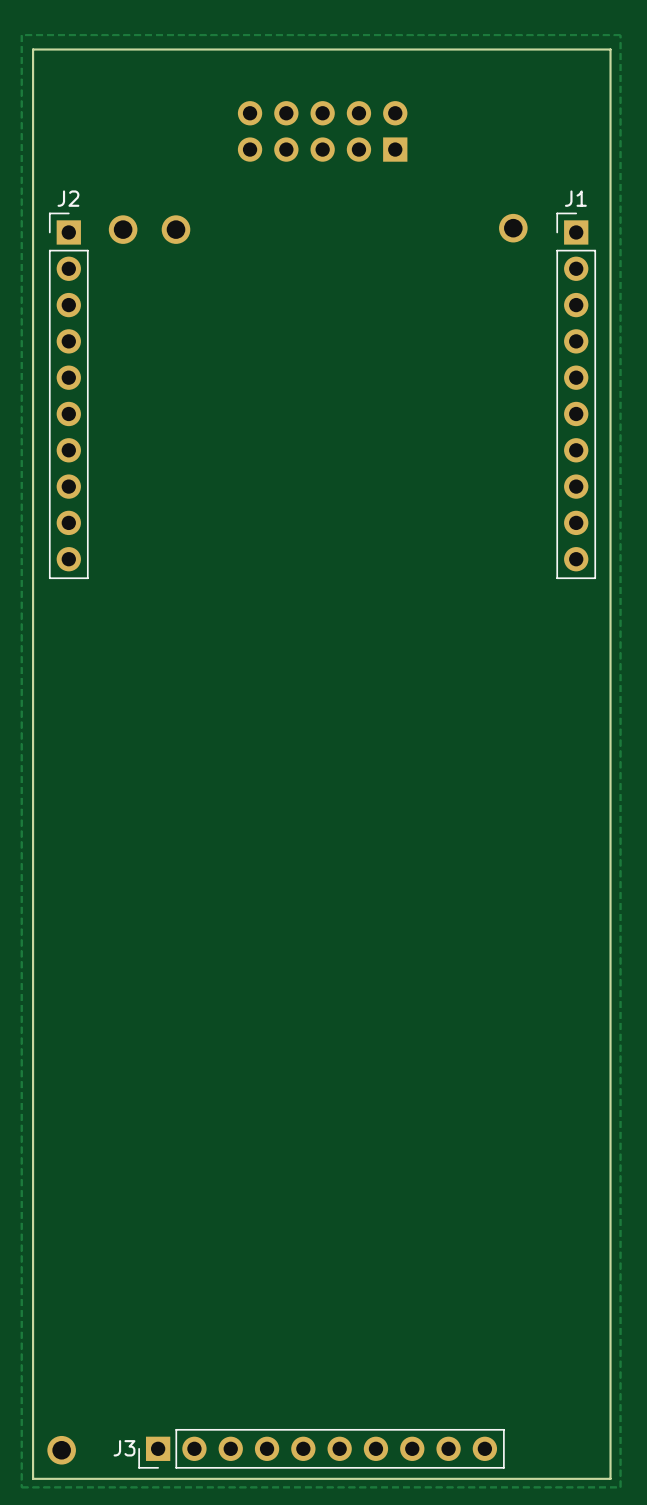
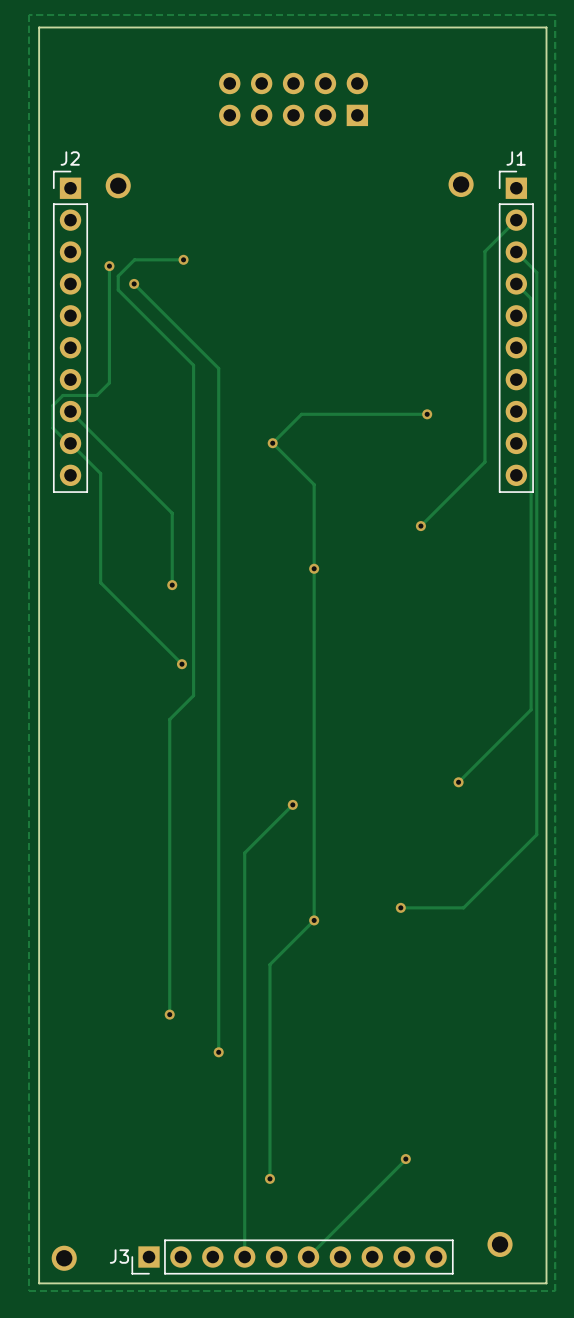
part: (176, 229) -> none
track: none -> (516, 220) (484, 251) (484, 462) (420, 526)
track: none -> (516, 252) (536, 272) (536, 834) (463, 907) (400, 907)
track: none -> (183, 259) (134, 259) (118, 276) (118, 289) (193, 365) (193, 695) (169, 719) (169, 1014)
via: none -> (183, 259)
track: none -> (109, 266) (109, 382) (96, 395) (62, 395) (52, 405) (52, 428) (100, 473) (100, 582) (181, 664)
via: none -> (109, 266)
track: none -> (134, 283) (218, 368) (218, 1052)
via: none -> (134, 283)
track: none -> (516, 283) (531, 298) (531, 709) (458, 782)
track: none -> (70, 411) (172, 513) (172, 585)
track: none -> (427, 414) (301, 414) (272, 443) (314, 484) (314, 920) (269, 964) (269, 1178)
via: none -> (427, 414)
via: none -> (272, 443)
via: none -> (420, 526)
via: none -> (314, 568)
via: none -> (172, 585)
via: none -> (181, 664)
via: none -> (458, 782)
track: none -> (292, 804) (244, 852) (244, 1257)
via: none -> (292, 804)
via: none -> (400, 907)
via: none -> (314, 920)
via: none -> (169, 1014)
via: none -> (218, 1052)
track: none -> (405, 1159) (308, 1257)
via: none -> (405, 1159)
via: none -> (269, 1178)
part: none -> (500, 1244)

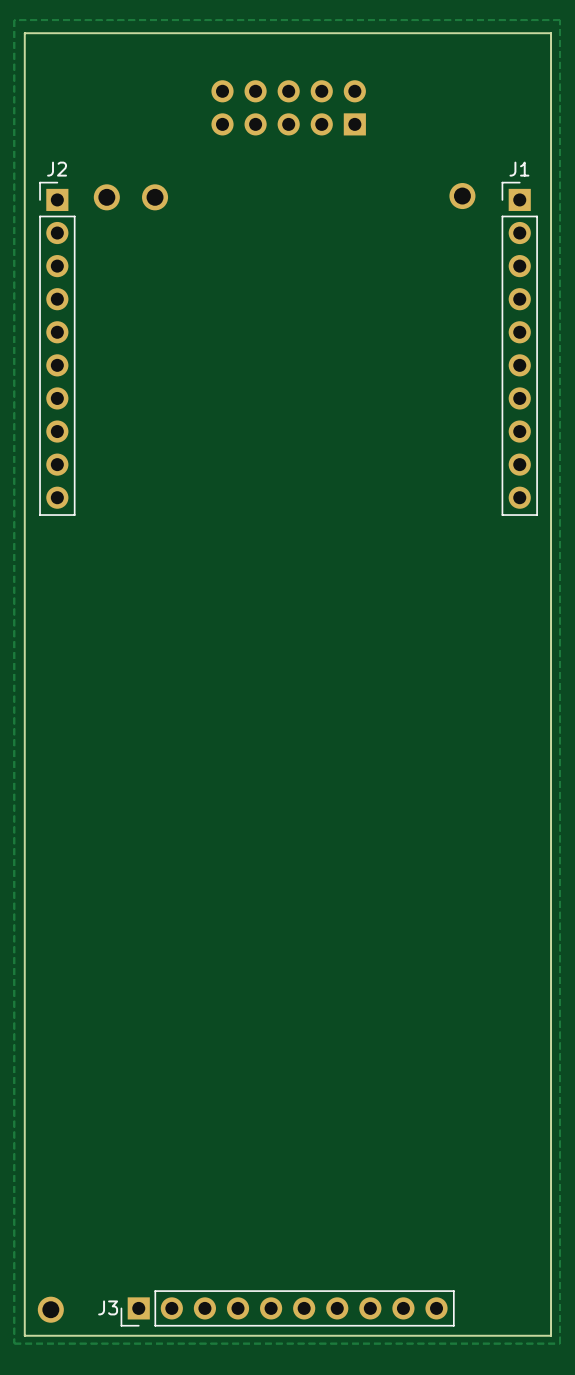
part: none -> (155, 197)
track: (516, 220) (484, 251) (484, 462) (420, 526) -> none
track: (516, 252) (536, 272) (536, 834) (463, 907) (400, 907) -> none
track: (183, 259) (134, 259) (118, 276) (118, 289) (193, 365) (193, 695) (169, 719) (169, 1014) -> none
via: (183, 259) -> none
track: (109, 266) (109, 382) (96, 395) (62, 395) (52, 405) (52, 428) (100, 473) (100, 582) (181, 664) -> none
via: (109, 266) -> none
track: (134, 283) (218, 368) (218, 1052) -> none
via: (134, 283) -> none
track: (516, 283) (531, 298) (531, 709) (458, 782) -> none
track: (70, 411) (172, 513) (172, 585) -> none
track: (427, 414) (301, 414) (272, 443) (314, 484) (314, 920) (269, 964) (269, 1178) -> none
via: (427, 414) -> none
via: (272, 443) -> none
via: (420, 526) -> none
via: (314, 568) -> none
via: (172, 585) -> none
via: (181, 664) -> none
via: (458, 782) -> none
track: (292, 804) (244, 852) (244, 1257) -> none
via: (292, 804) -> none
via: (400, 907) -> none
via: (314, 920) -> none
via: (169, 1014) -> none
via: (218, 1052) -> none
track: (405, 1159) (308, 1257) -> none
via: (405, 1159) -> none
via: (269, 1178) -> none
part: (500, 1244) -> none

